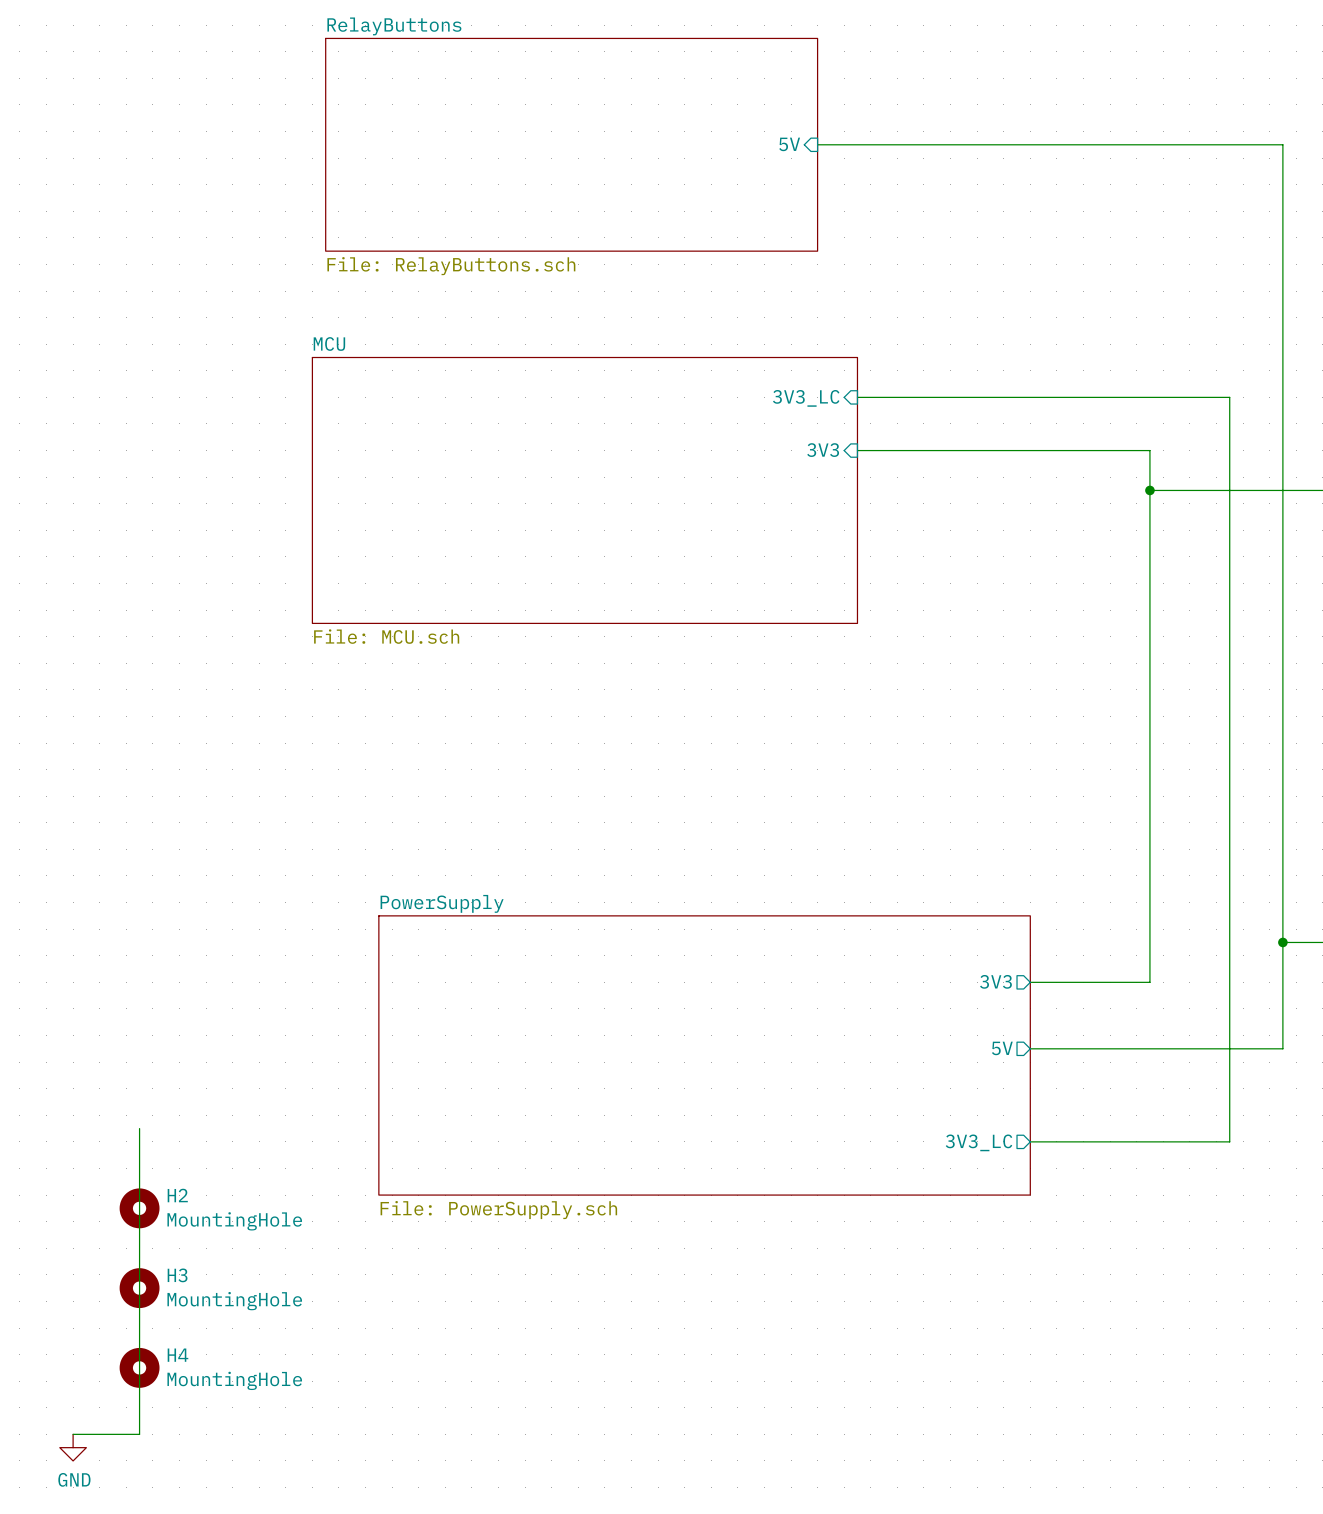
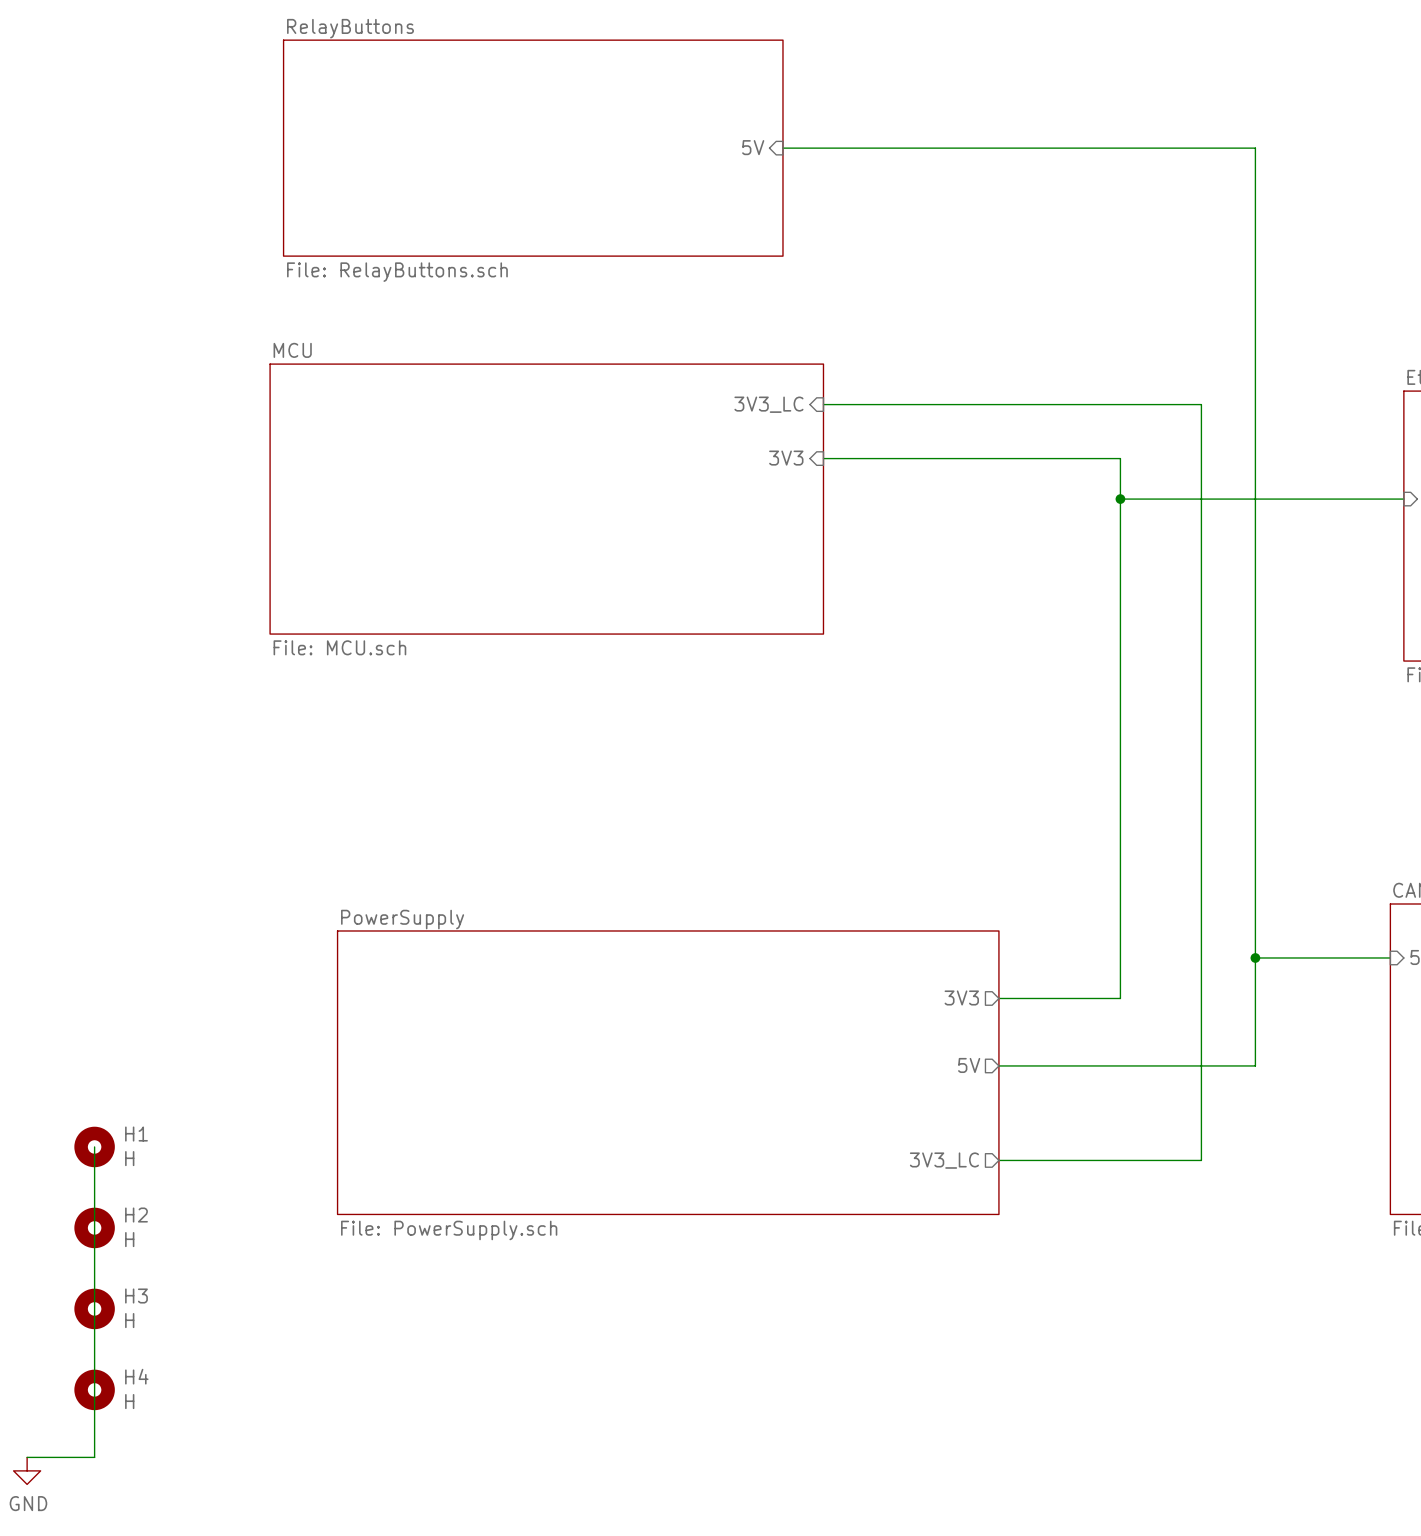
H1: none -> H (94, 1146)
H2 value: MountingHole (234, 1221) -> H (129, 1239)
H3 value: MountingHole (234, 1301) -> H (129, 1320)
H4 value: MountingHole (234, 1380) -> H (129, 1401)

